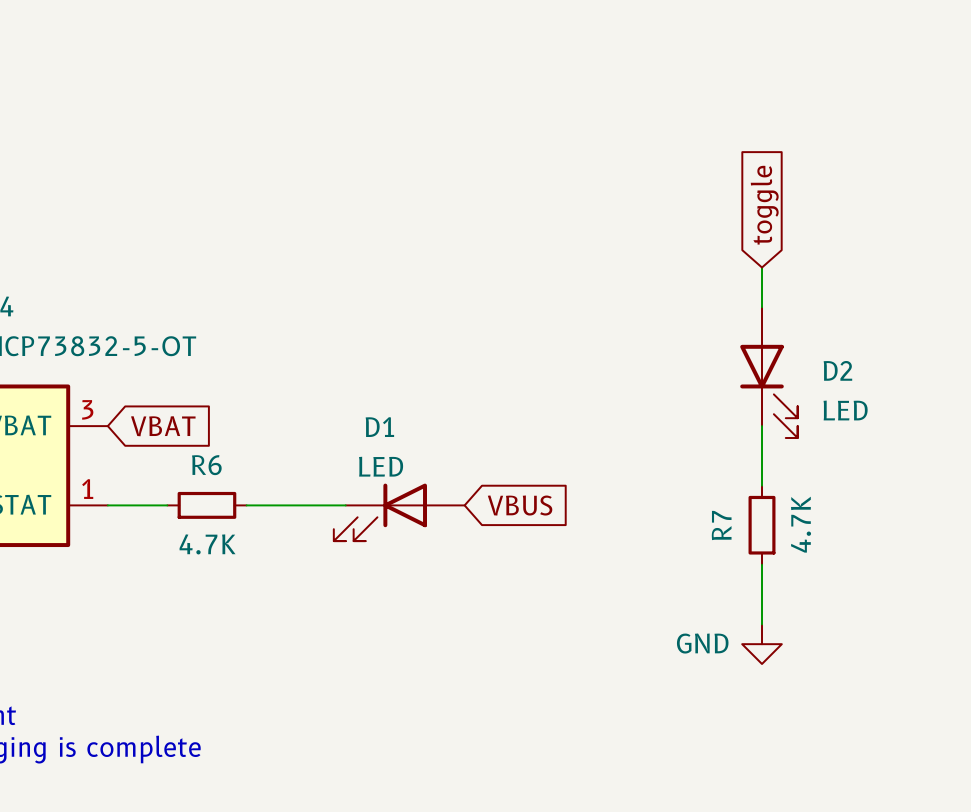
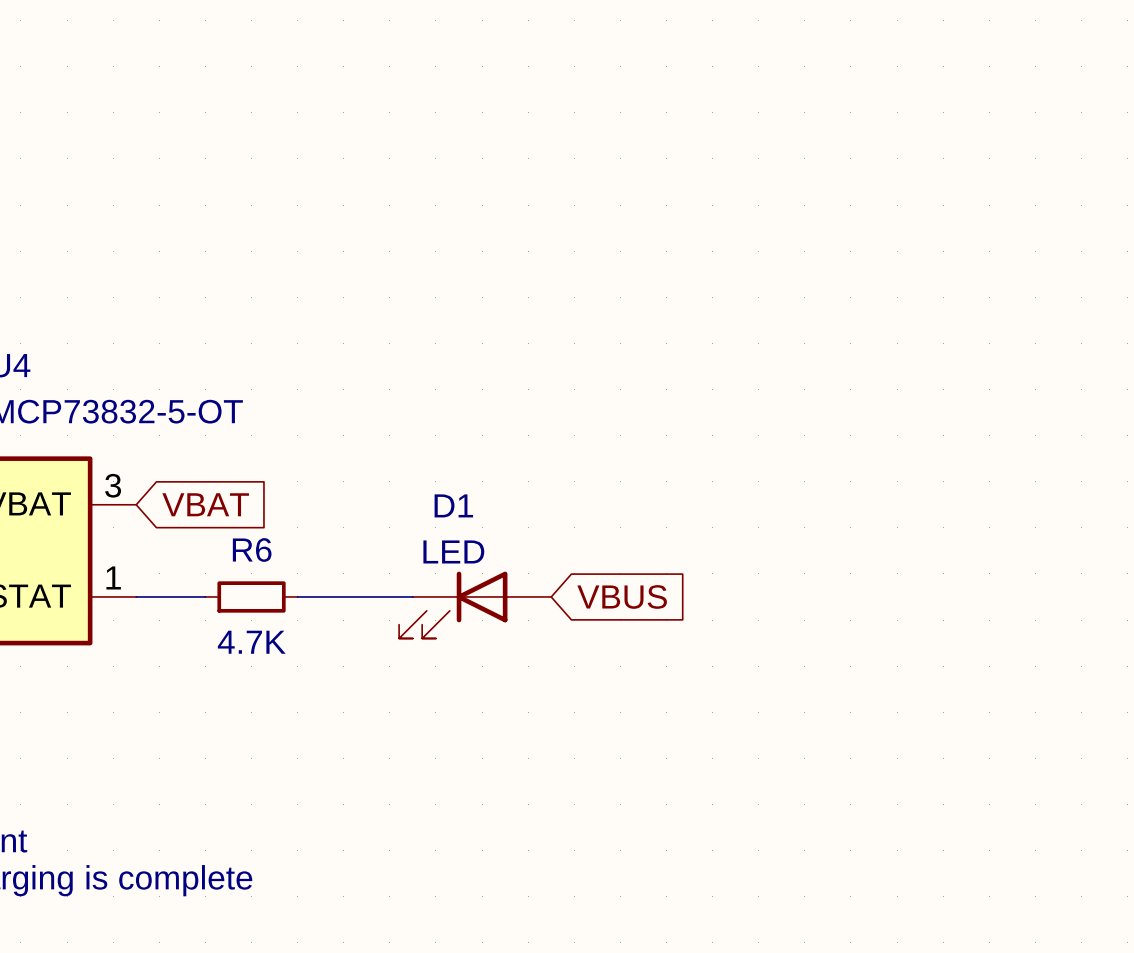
global label: toggle (764, 205) -> none
wire: (762, 267) (762, 307) -> none
D2: LED (768, 372) -> none
wire: (762, 426) (762, 485) -> none
R7: 4.7K (762, 525) -> none
wire: (762, 564) (762, 624) -> none
power symbol: GND (762, 644) -> none

